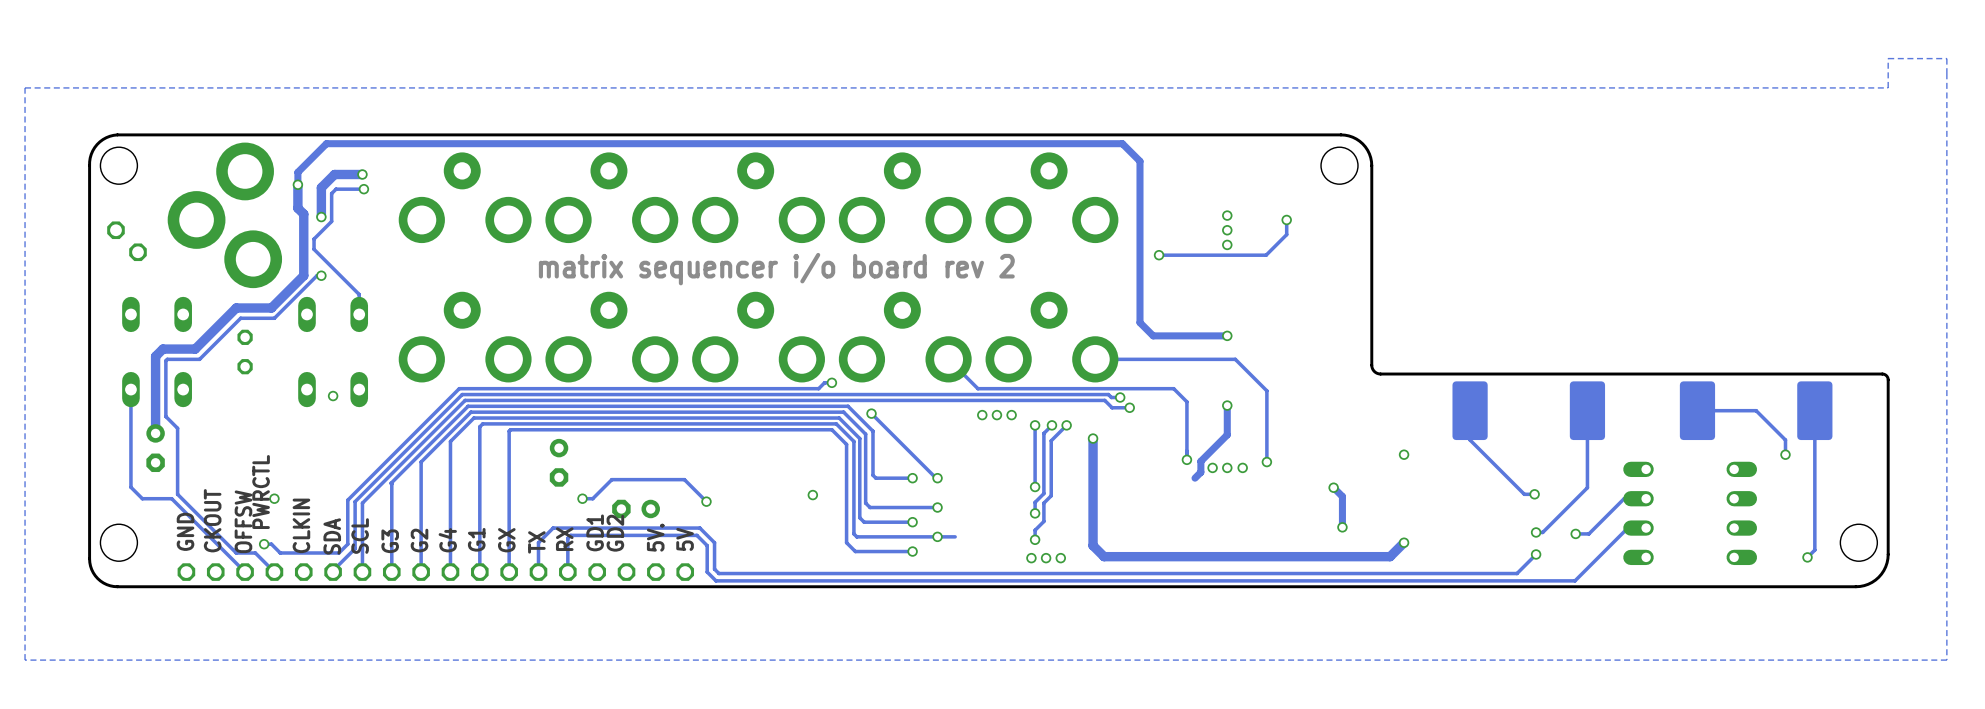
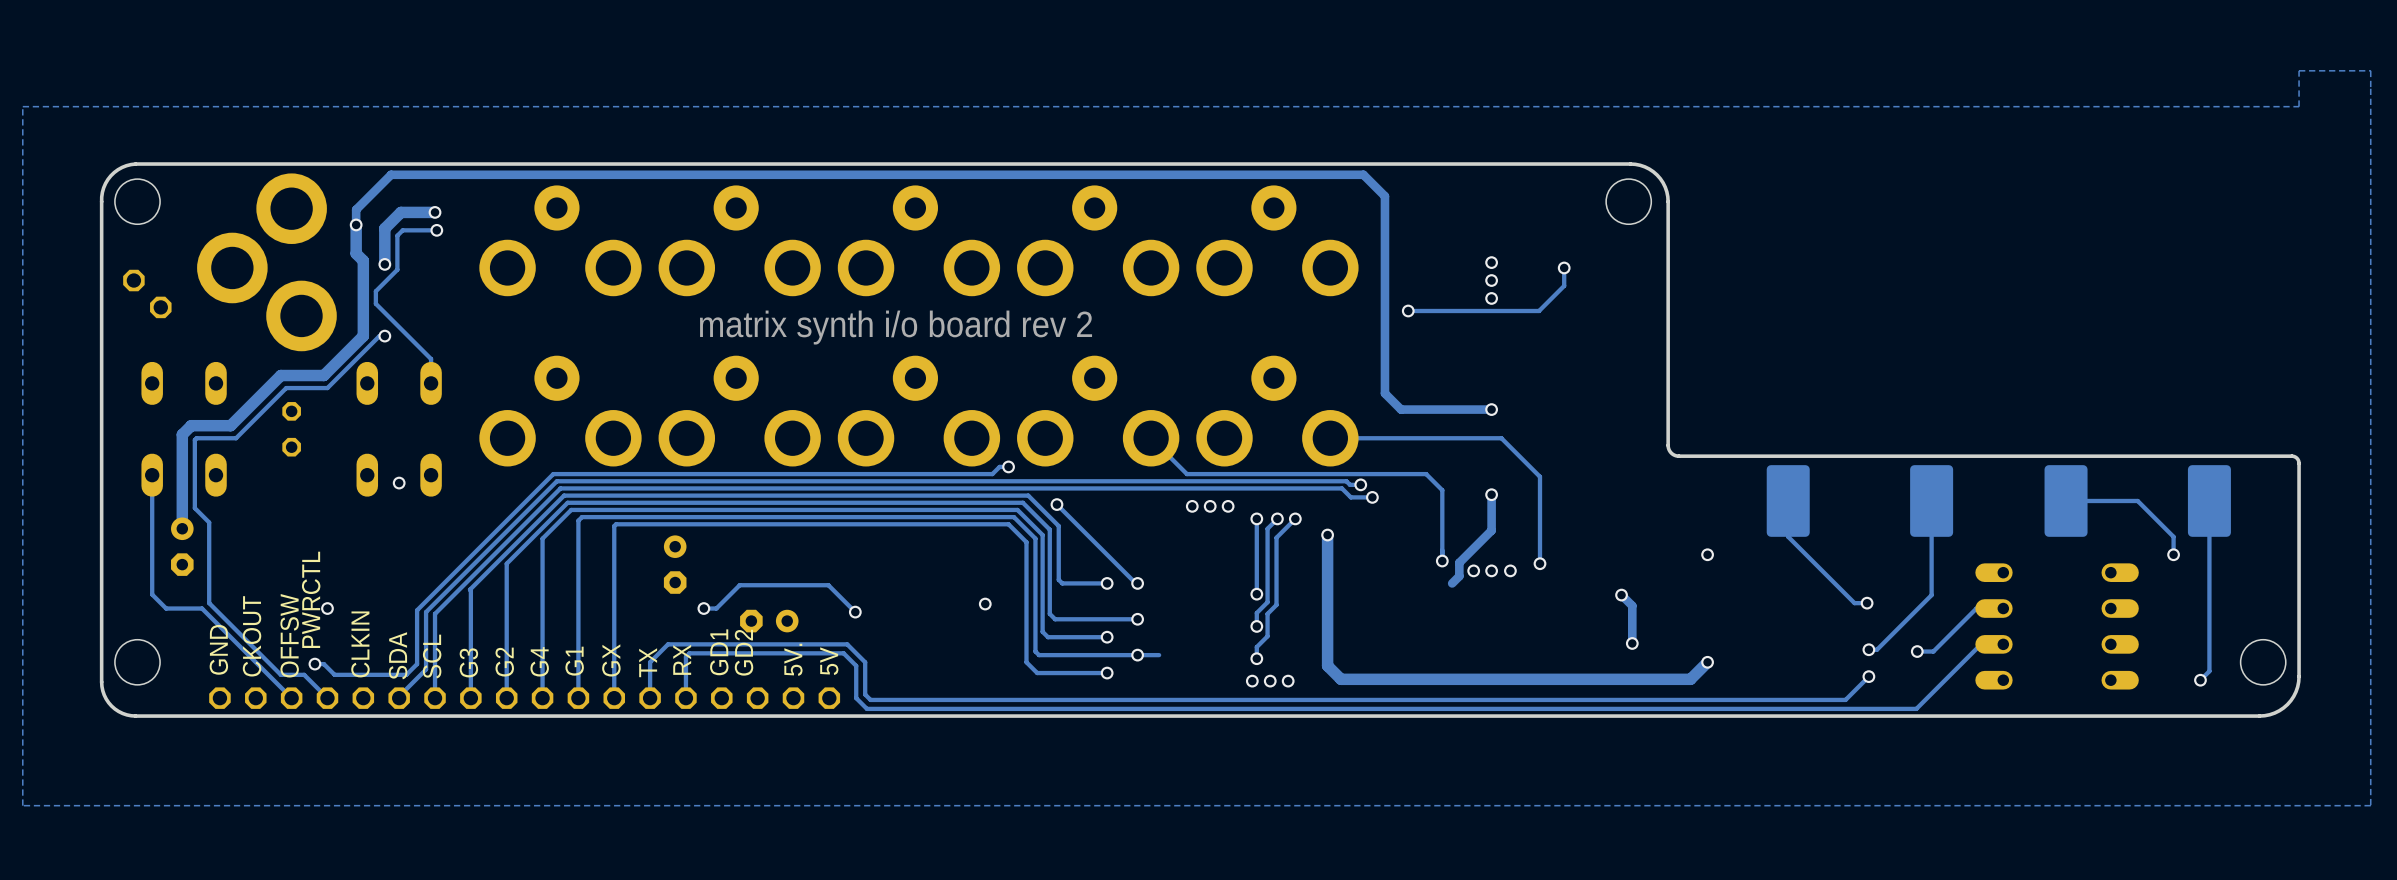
text: matrix sequencer i/o board rev 2 (776, 269) -> matrix synth i/o board rev 2 (896, 327)

